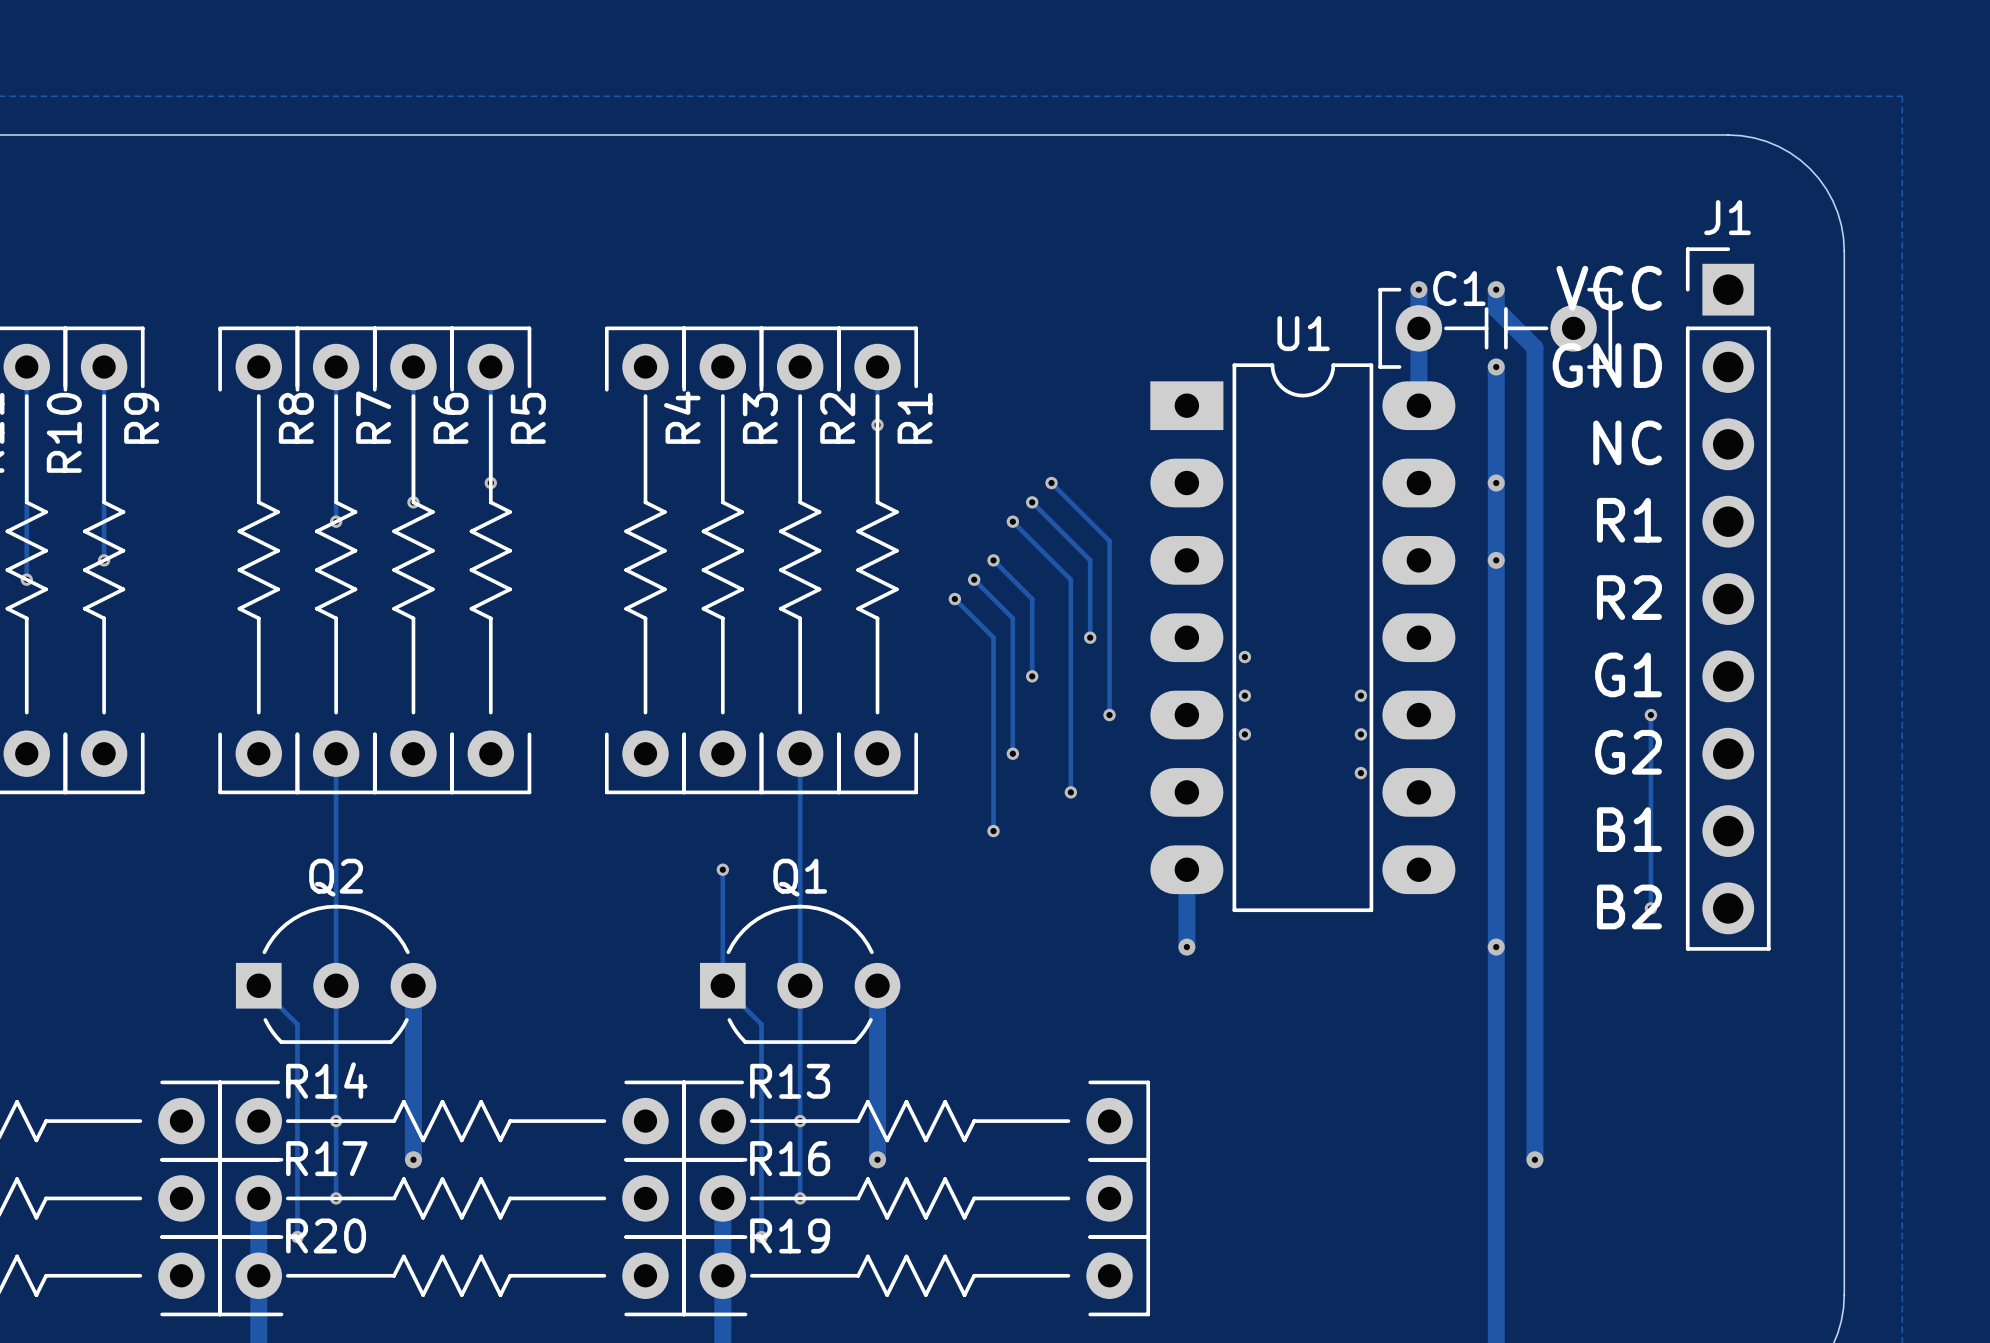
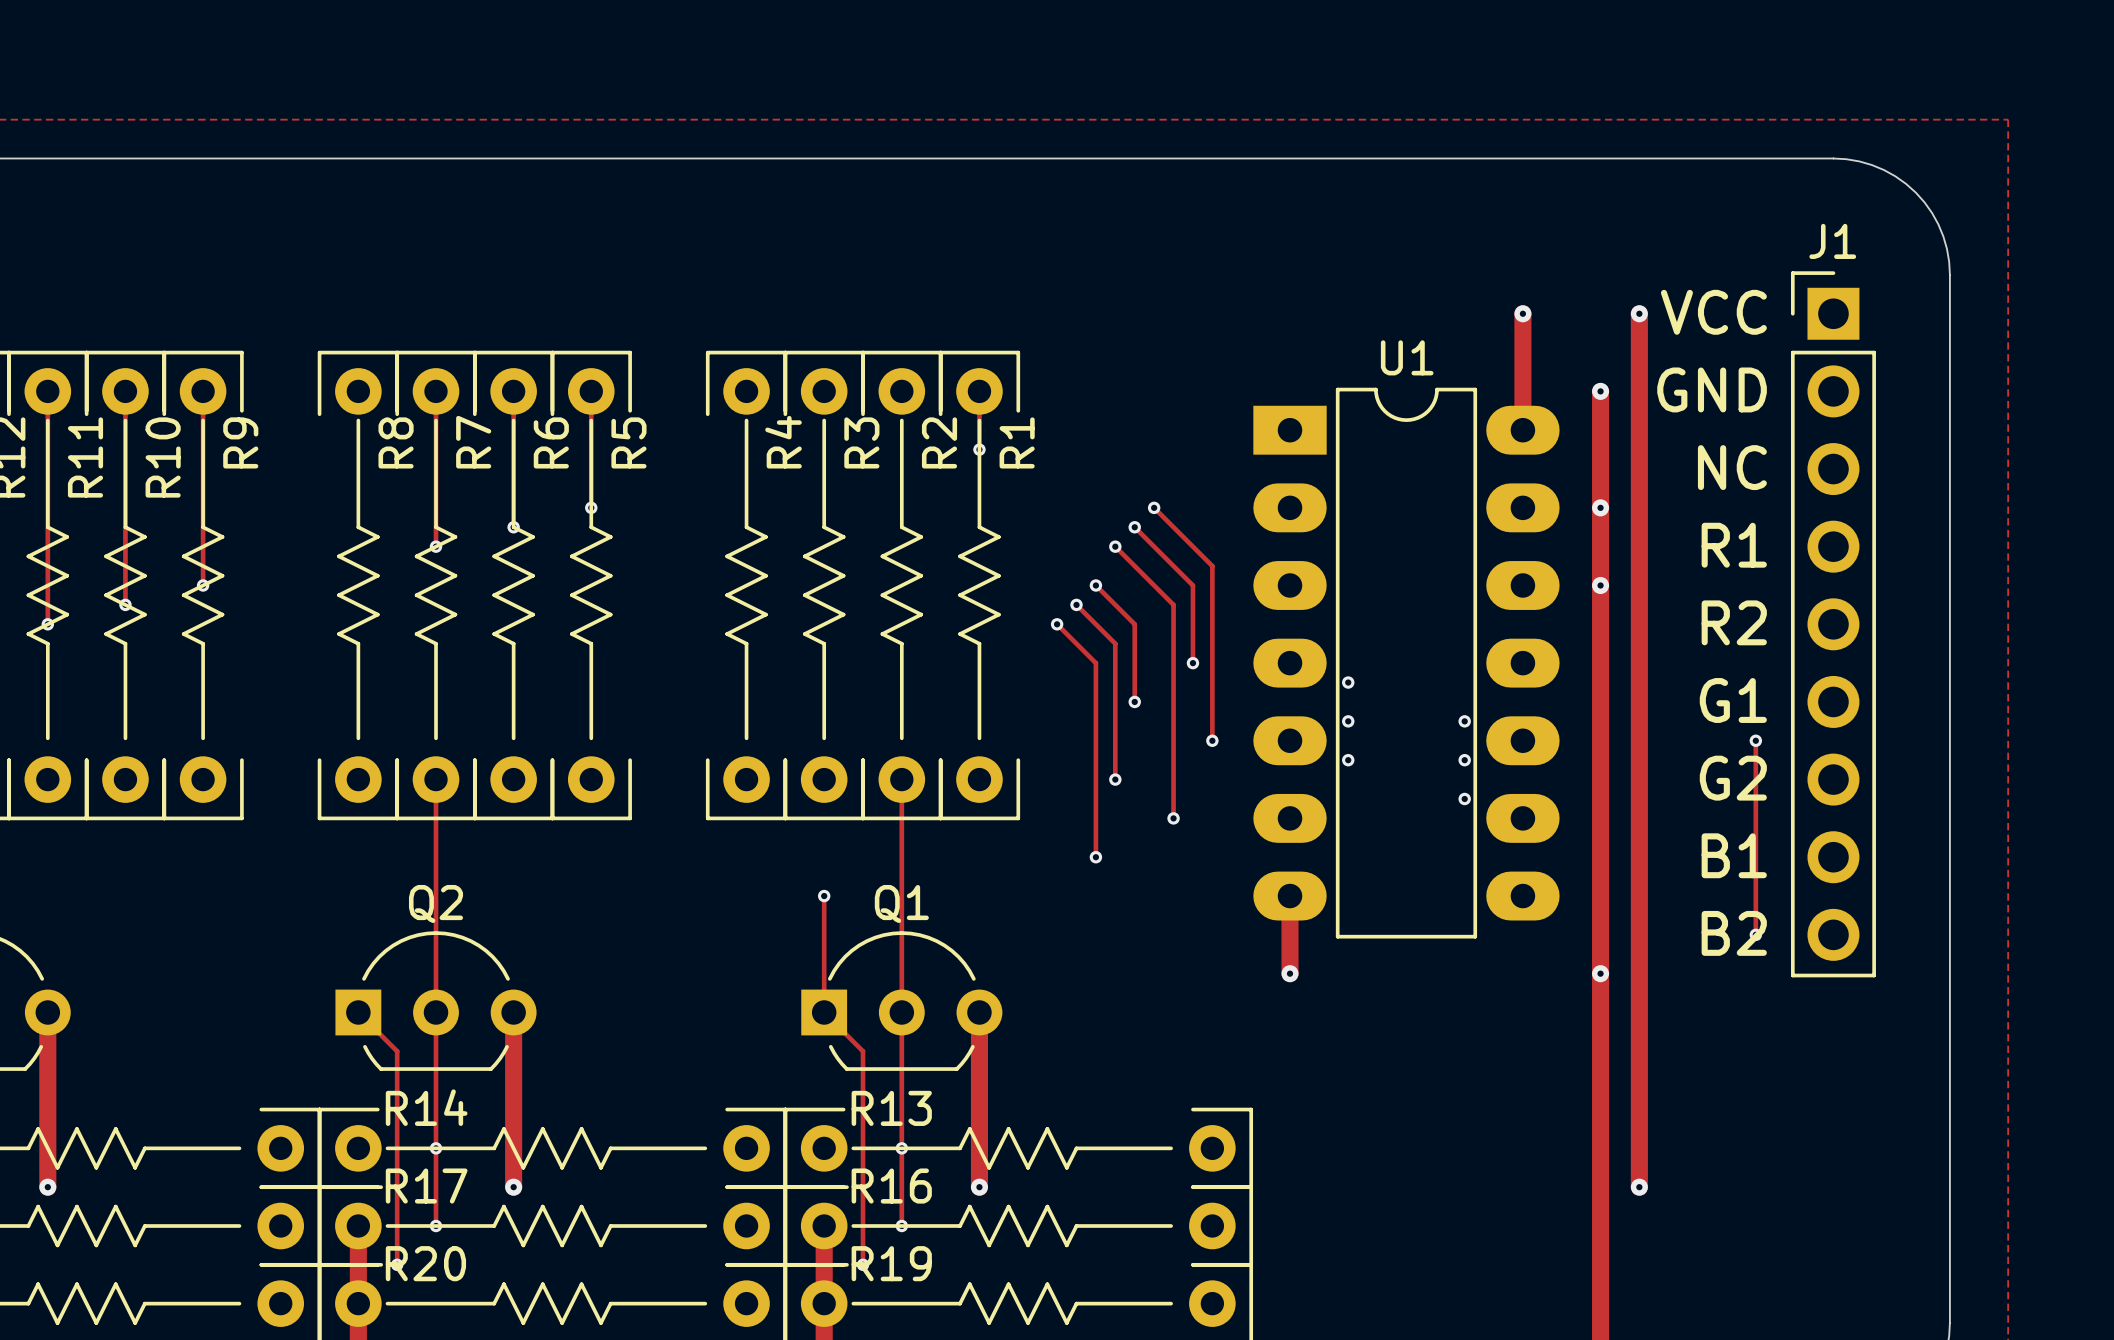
track: (1496, 289) (1496, 309) (1534, 347) -> (1639, 313) (1639, 371)
via position: (1496, 289) -> (1639, 313)
C1: (1495, 328) -> none

